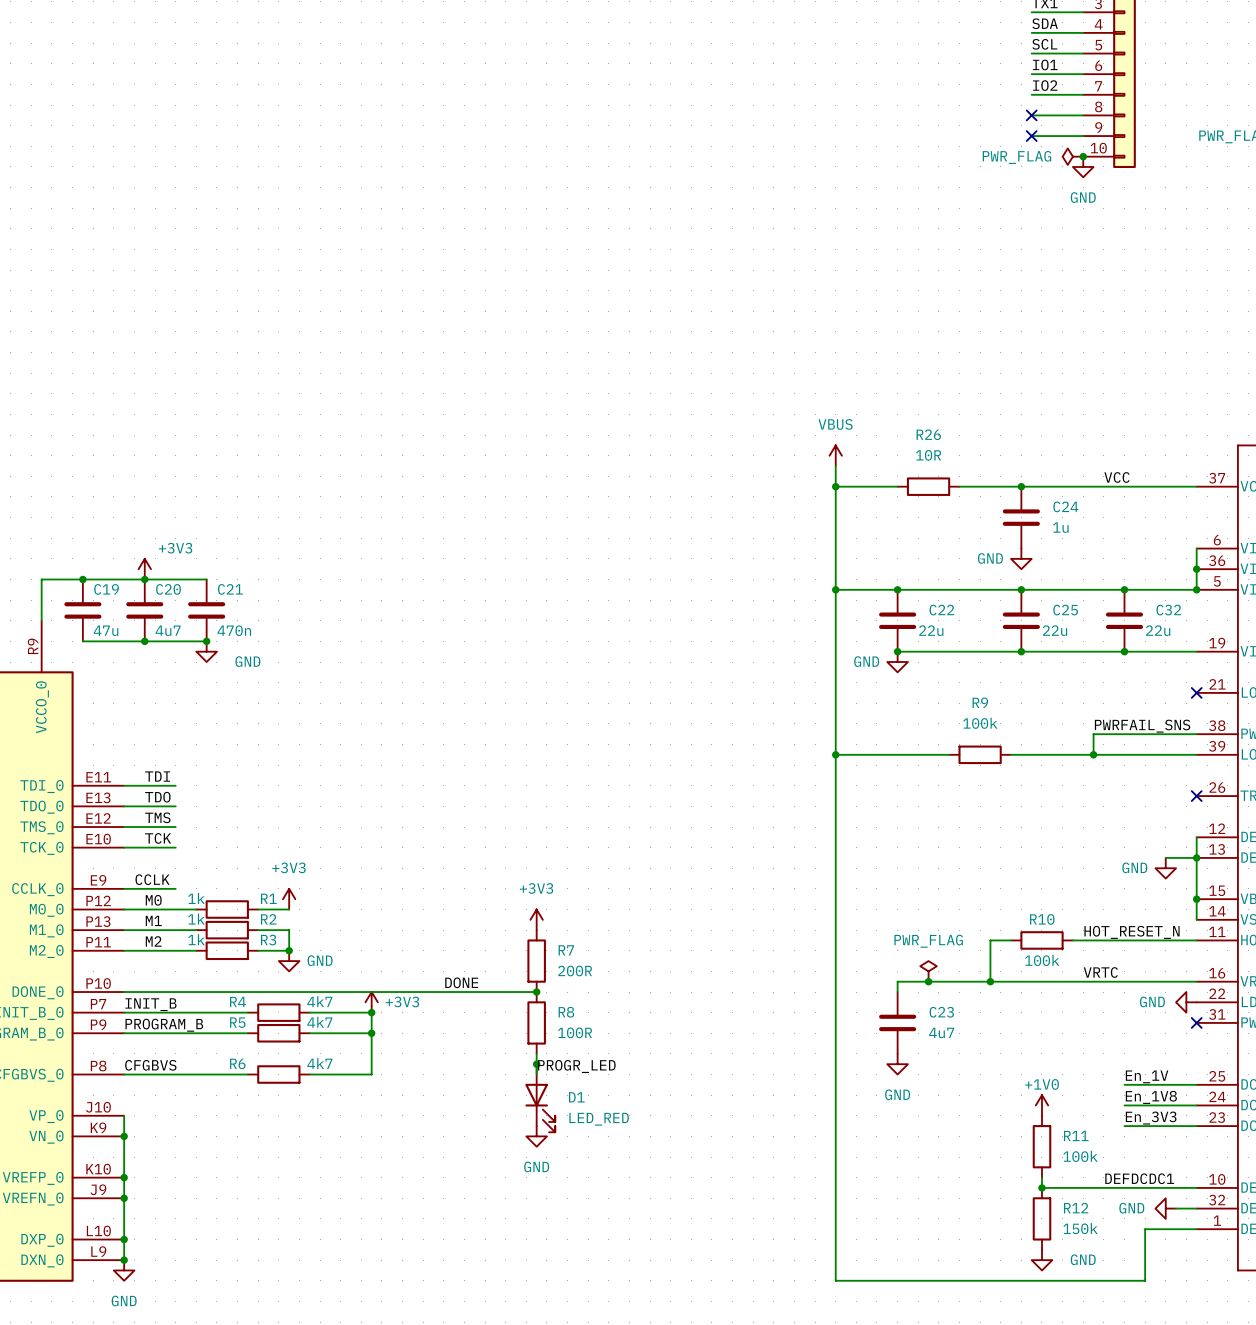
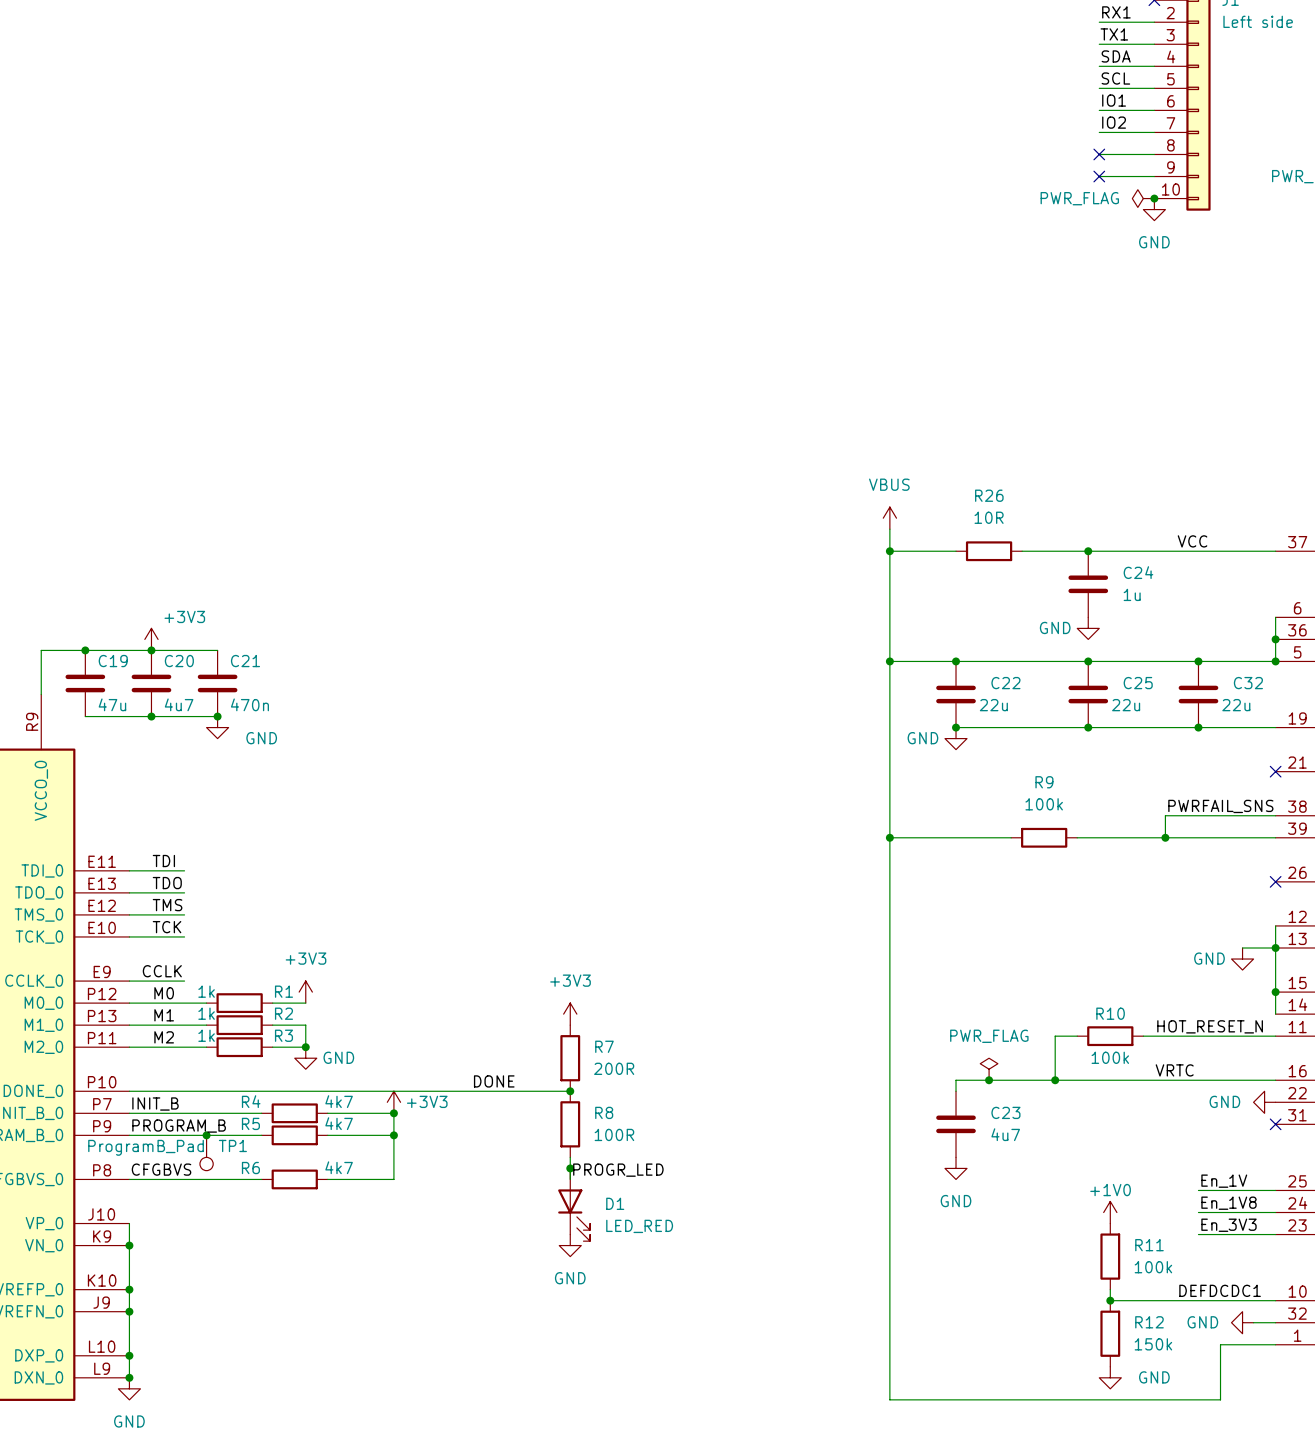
junction: none -> (206, 1135)
TP1: none -> ProgramB_Pad (206, 1152)

